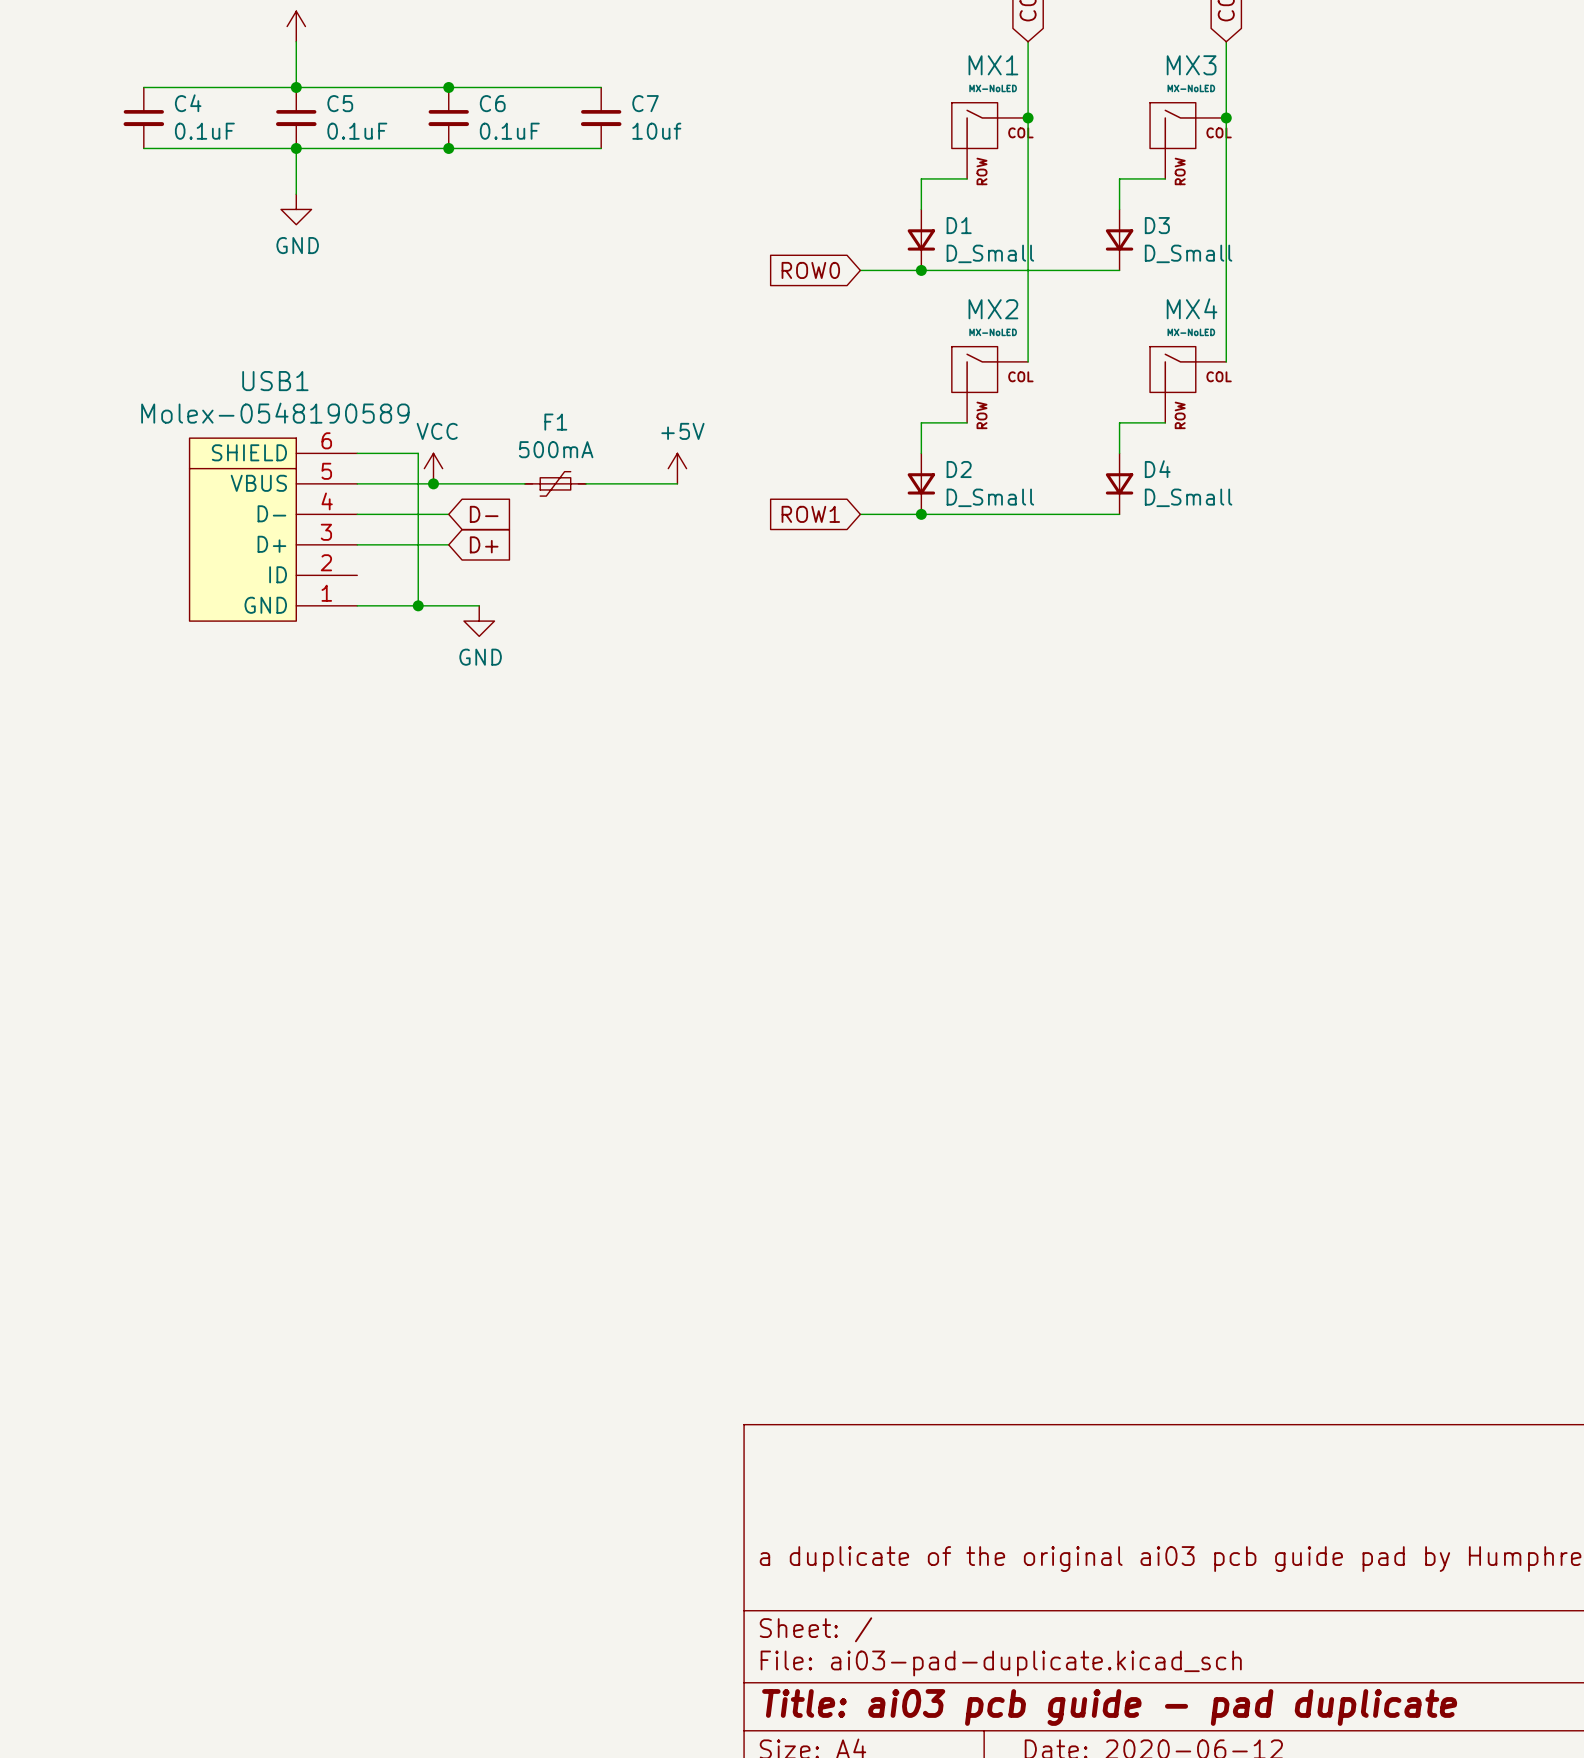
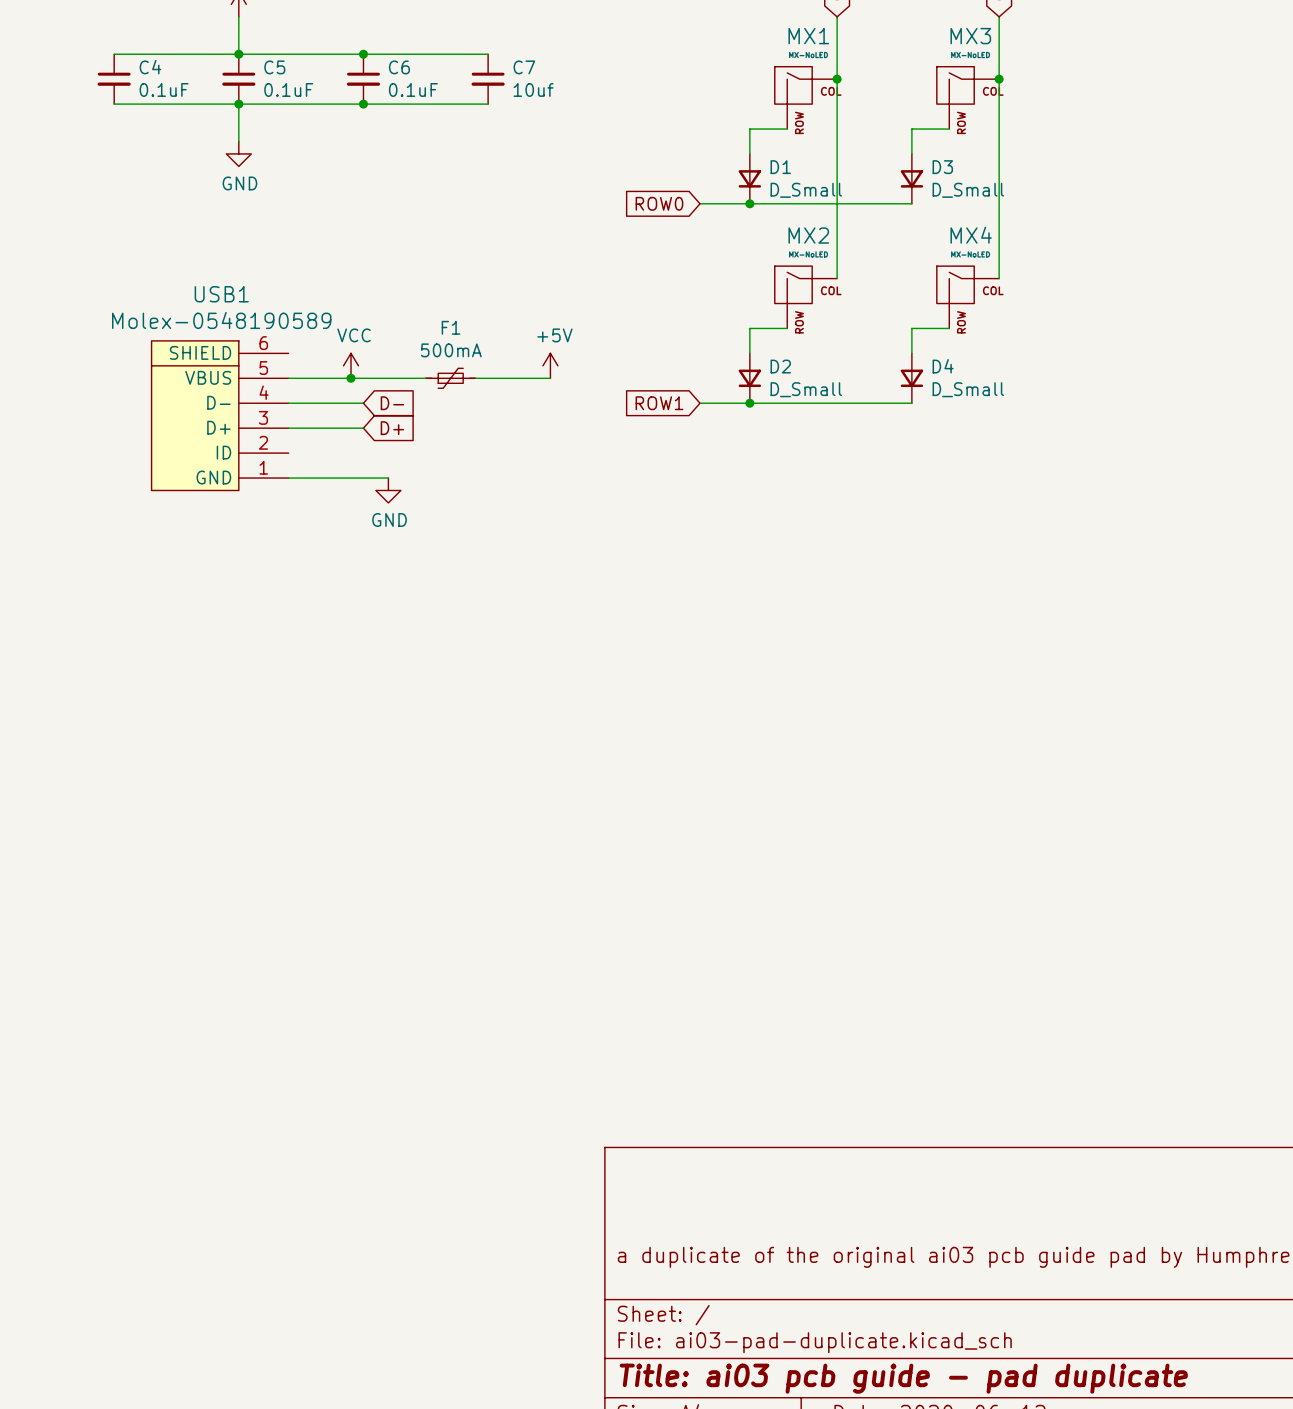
wire: (357, 453) (418, 453) (418, 605) -> none
junction: (418, 605) -> none

